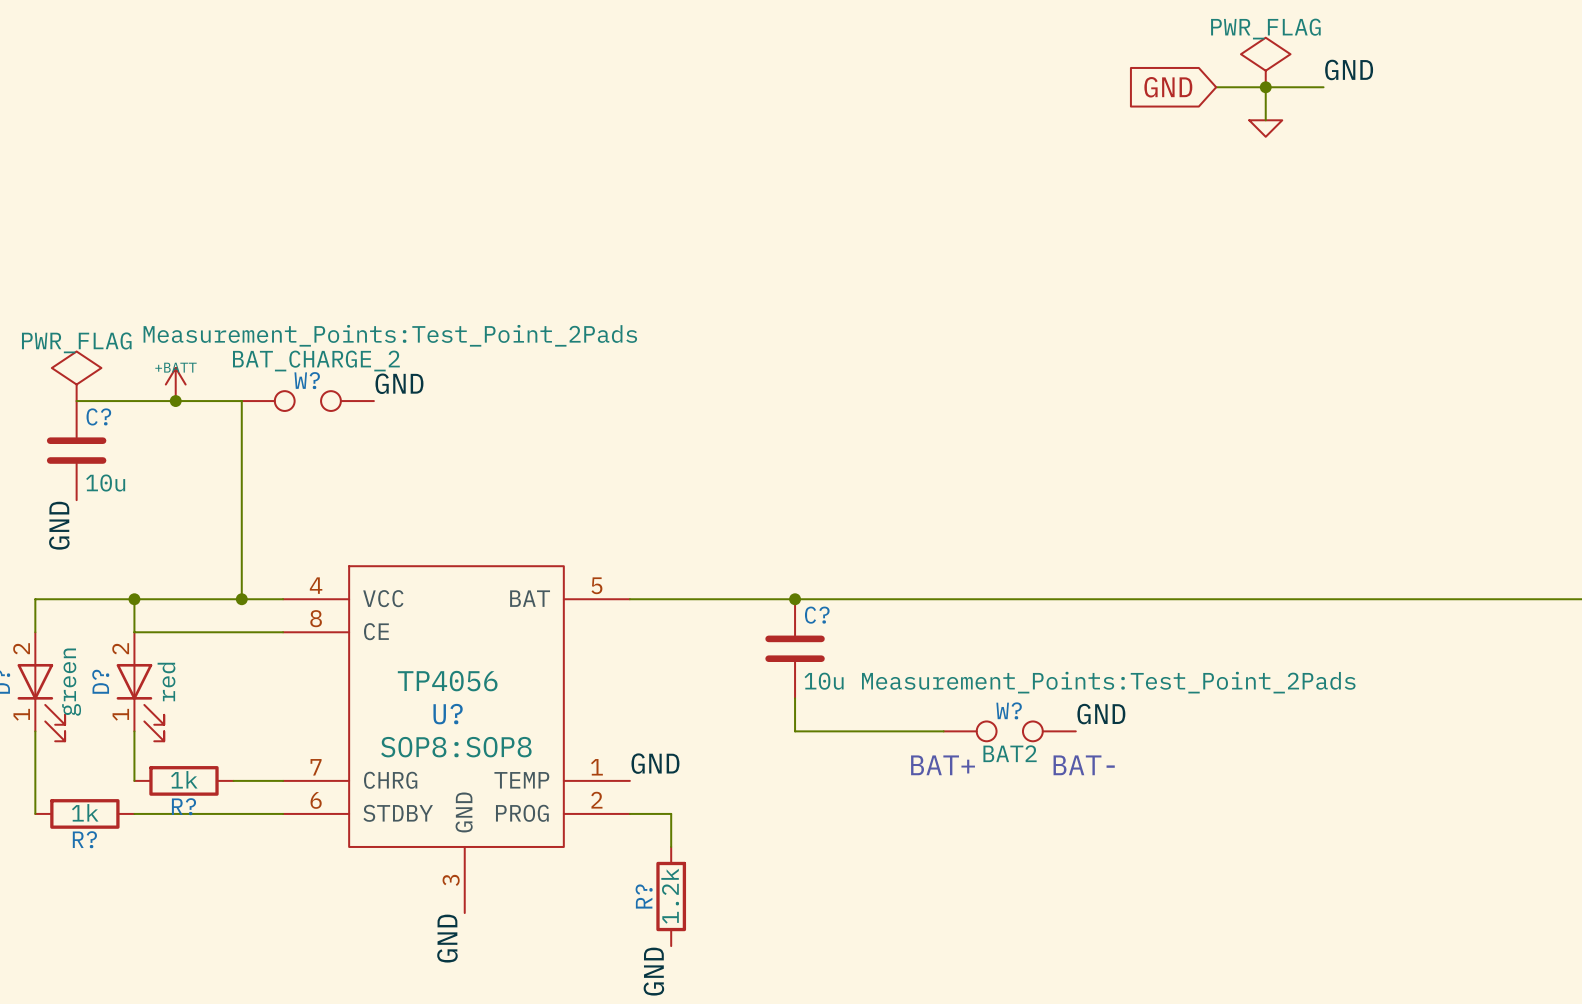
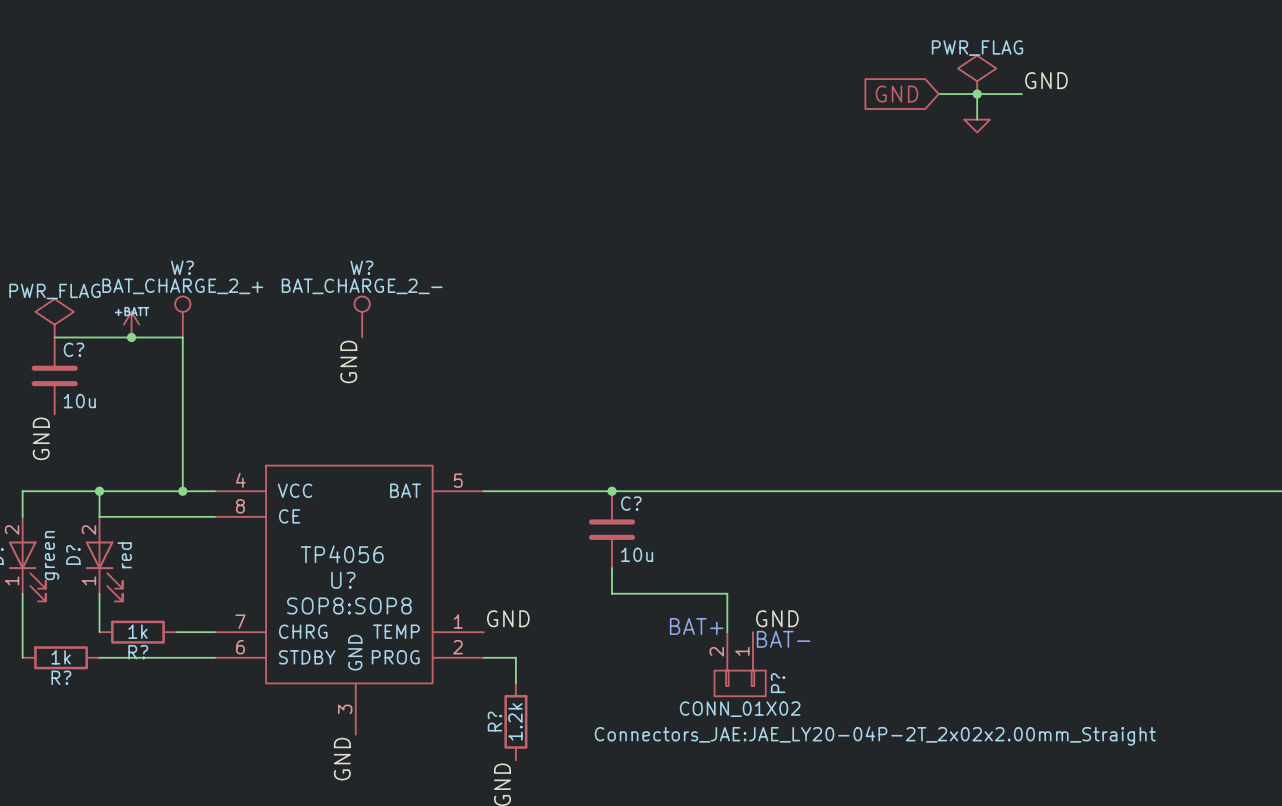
W?: none -> BAT_CHARGE_2_+ (182, 316)
W?: none -> BAT_CHARGE_2_- (362, 316)
label rotation: 0° (399, 383) -> 90° counterclockwise (348, 361)
W?: BAT_CHARGE_2 (307, 401) -> none
label position: GND (1101, 714) -> GND (777, 618)
wire: none -> (727, 593) (727, 632)
W?: BAT2 (1009, 731) -> none
text position: BAT+ (943, 765) -> BAT+ (696, 626)
text position: BAT- (1084, 765) -> BAT- (783, 639)
P?: none -> CONN_01X02 (740, 664)

